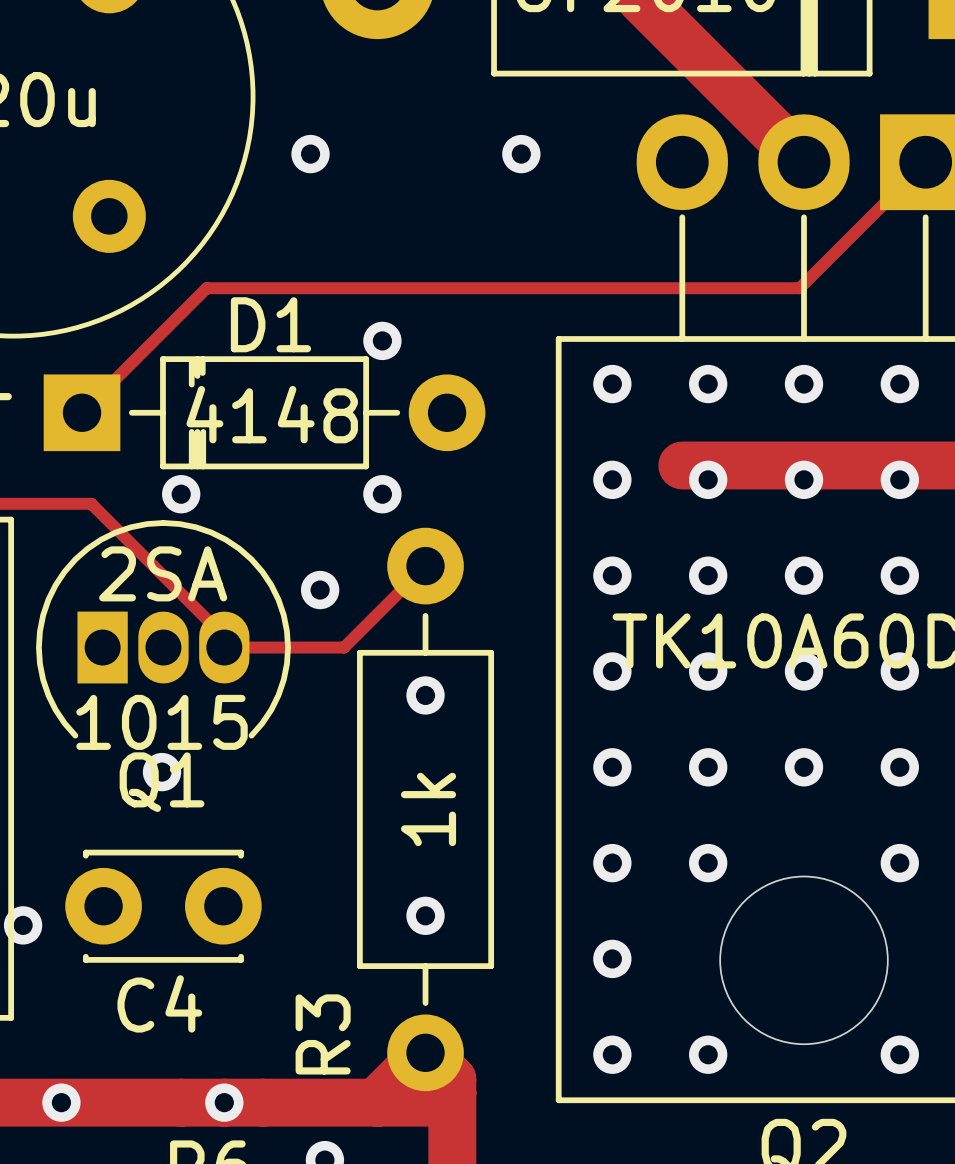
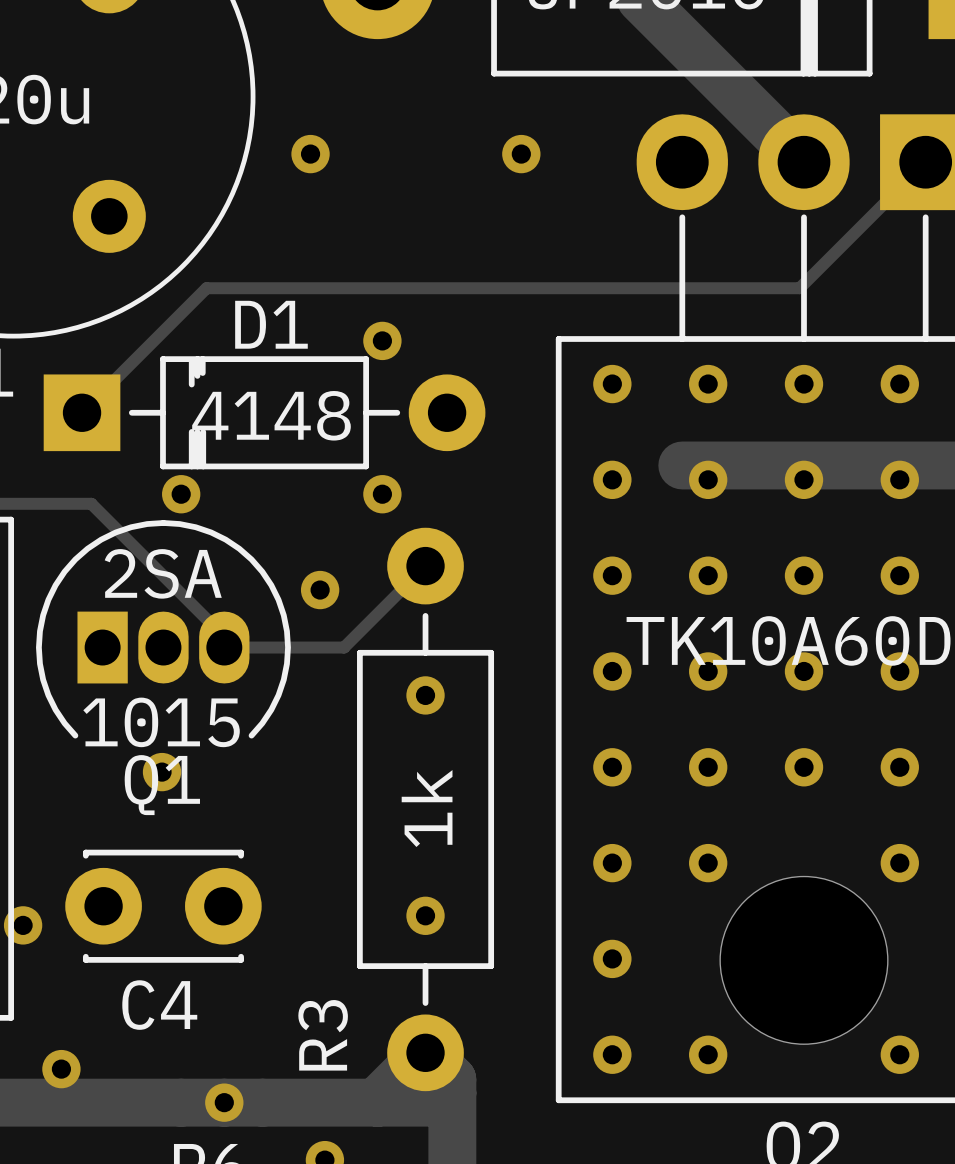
via position: (61, 1102) -> (61, 1069)

